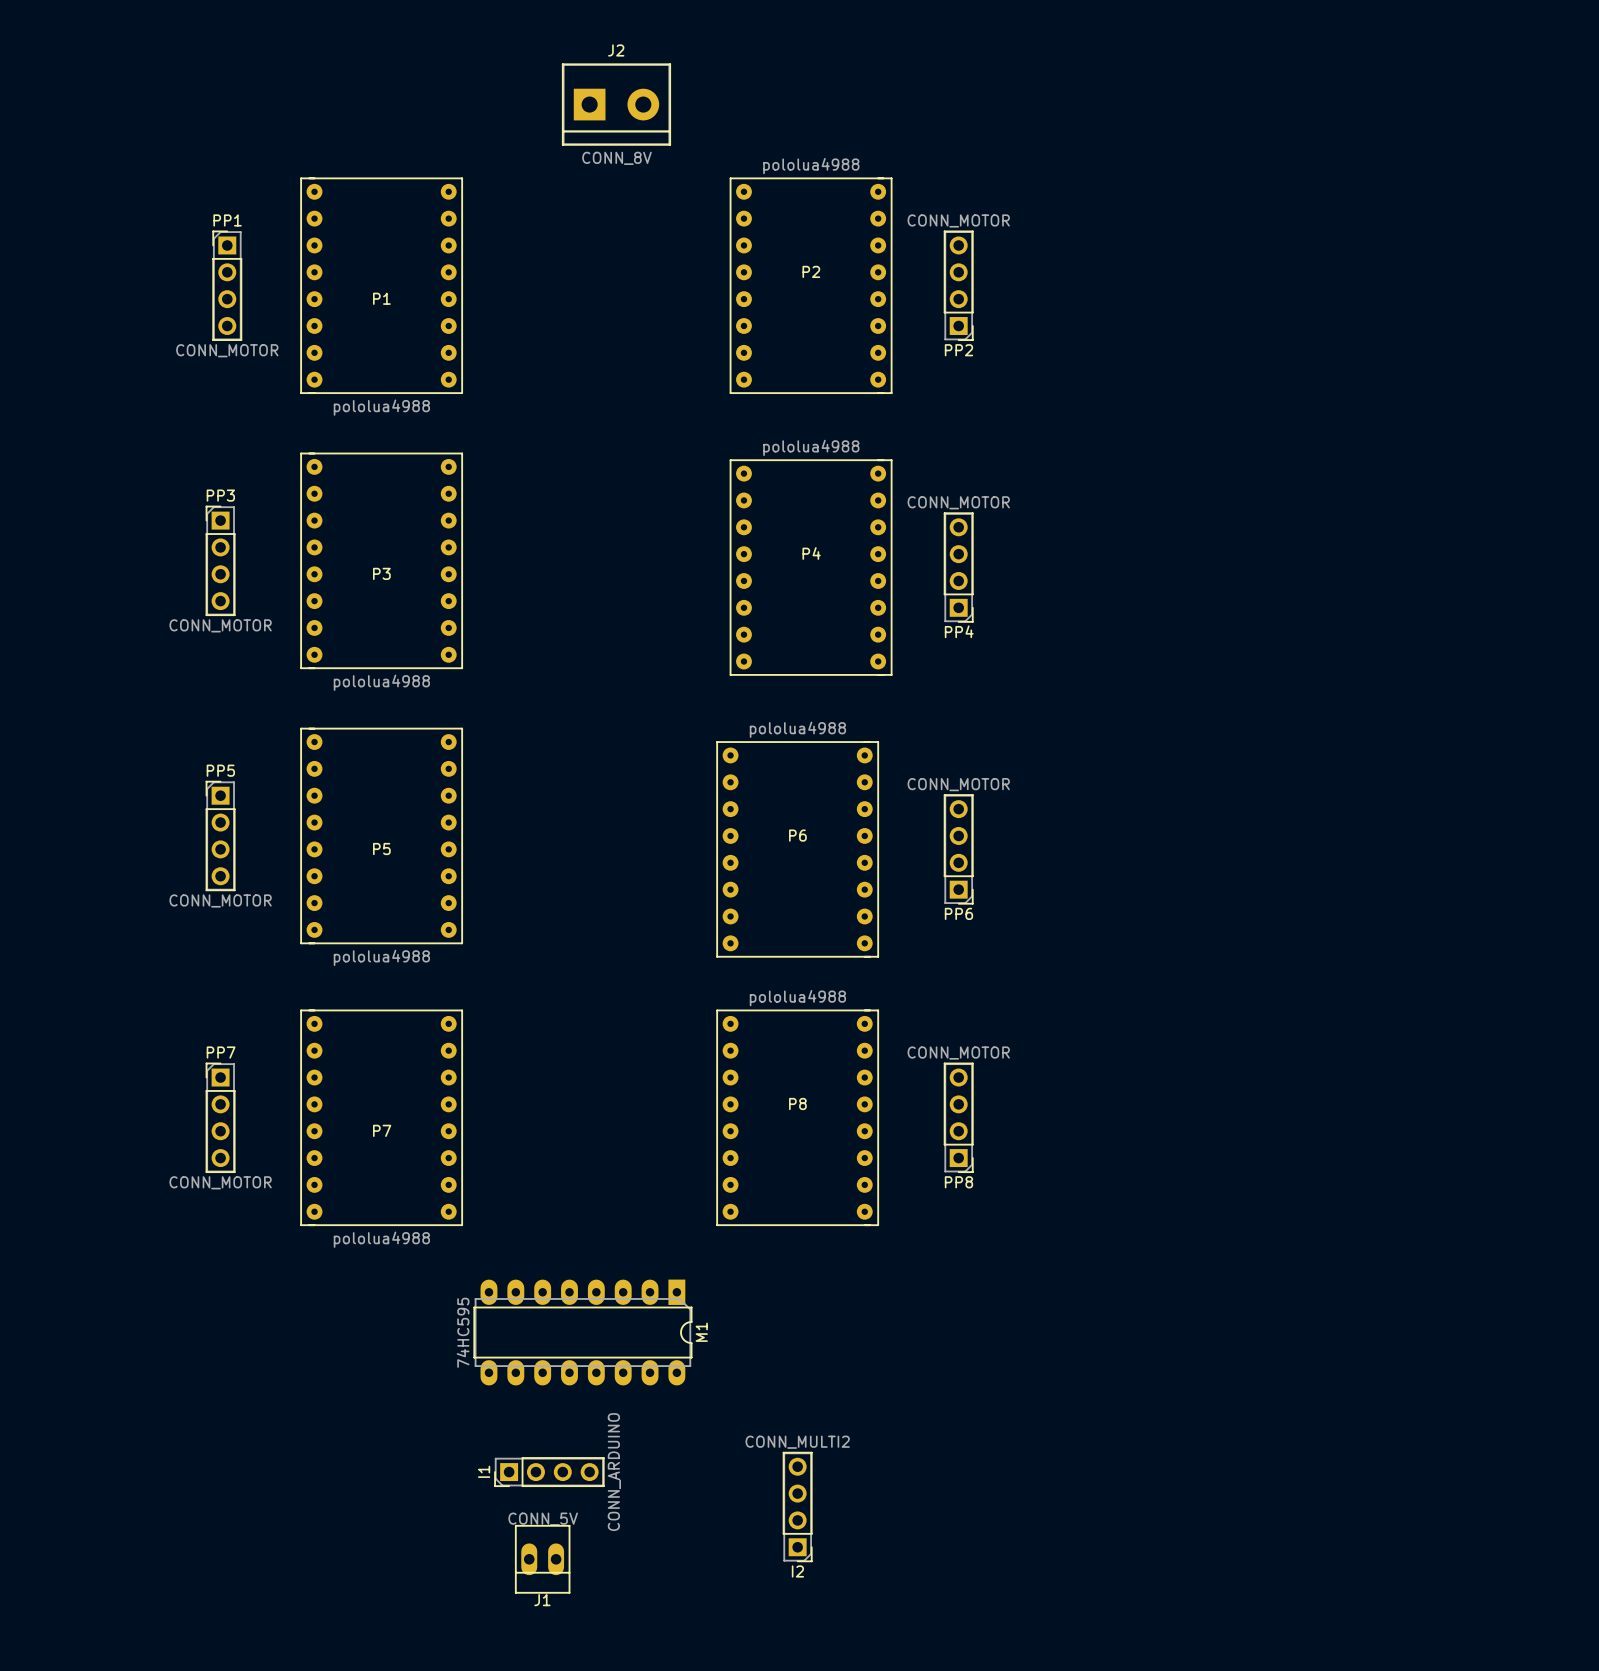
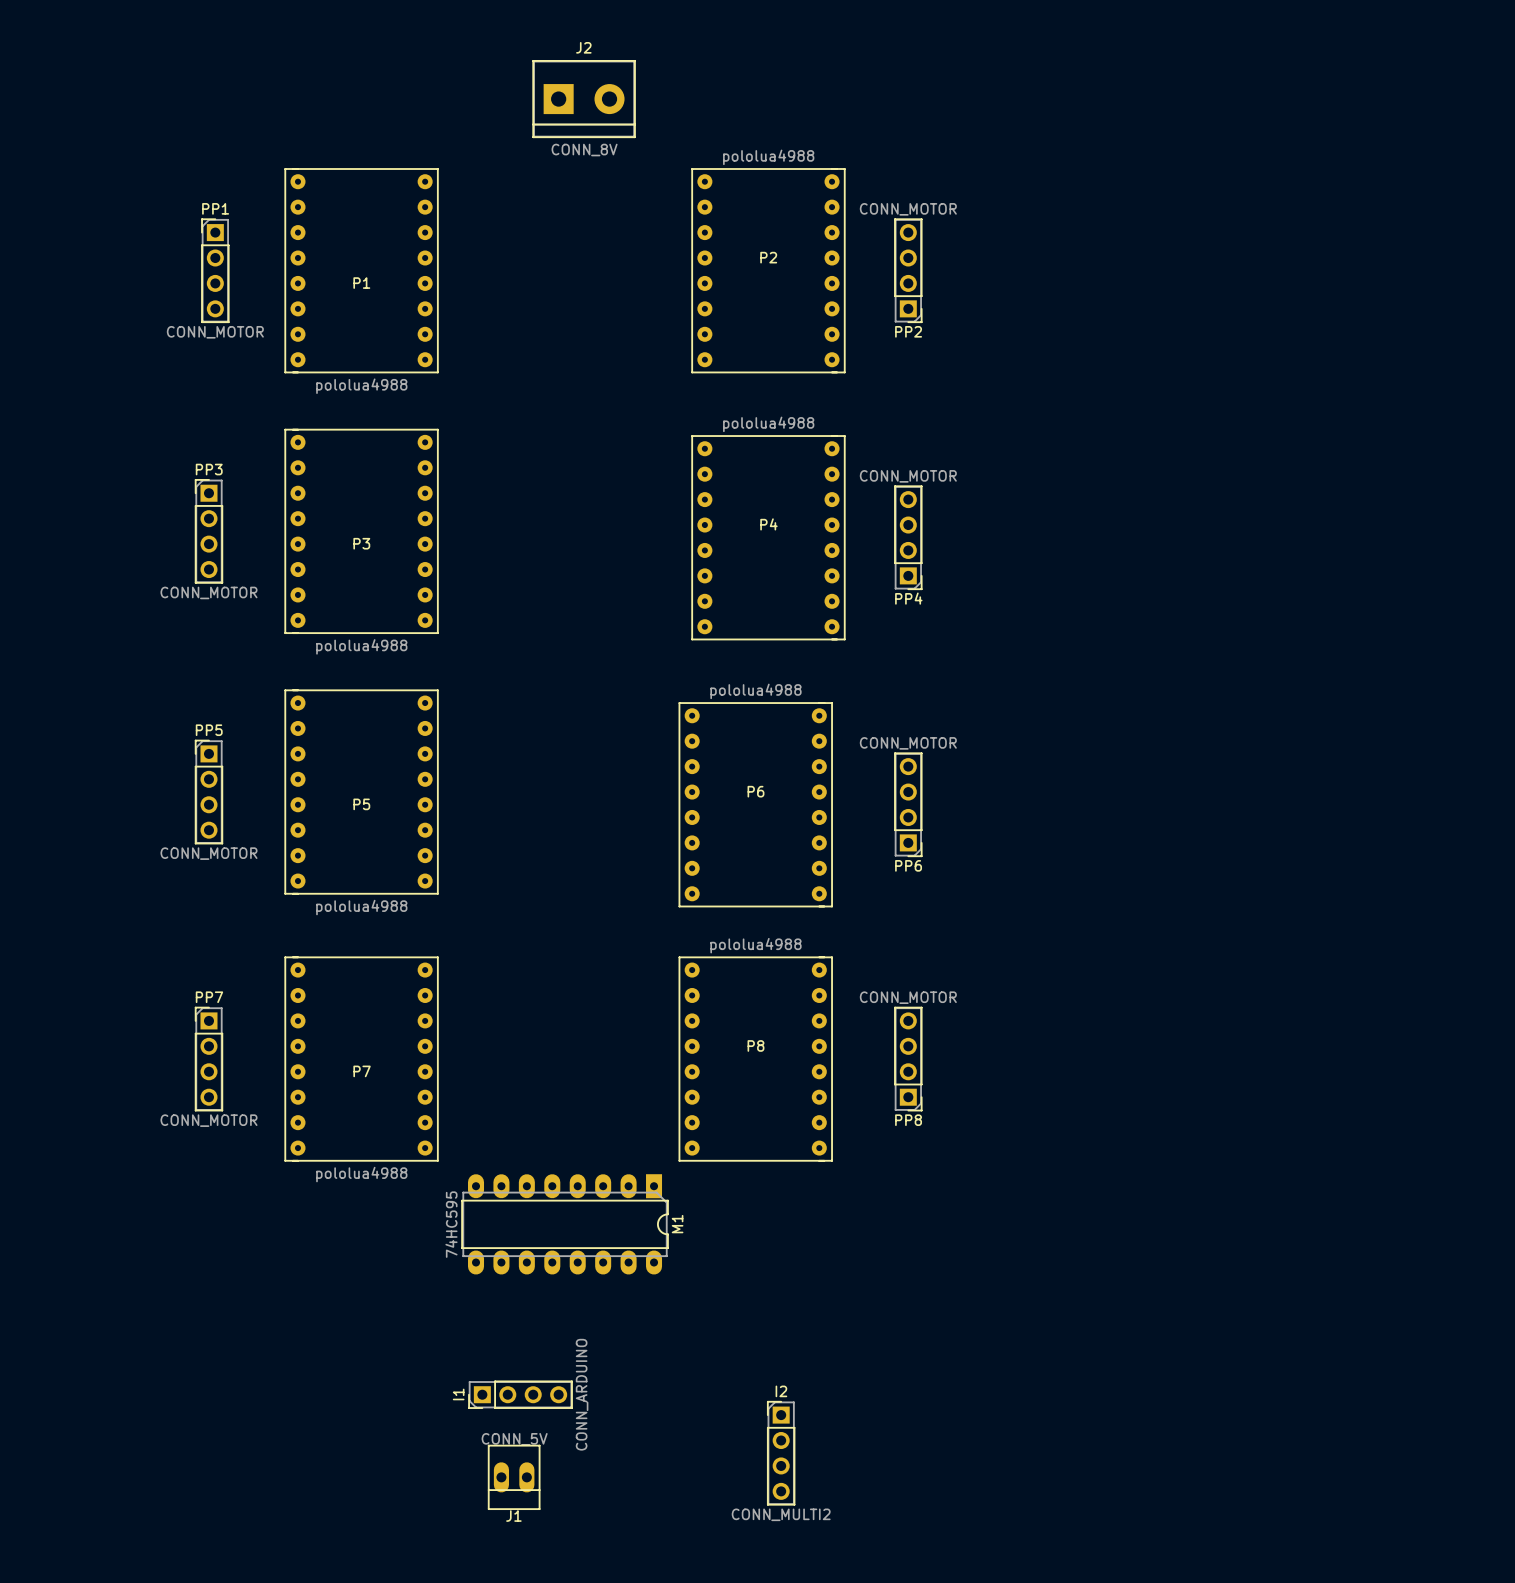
M1 position: (582, 1332) -> (565, 1224)
I2 rotation: 0° (797, 1506) -> 180° (781, 1453)

